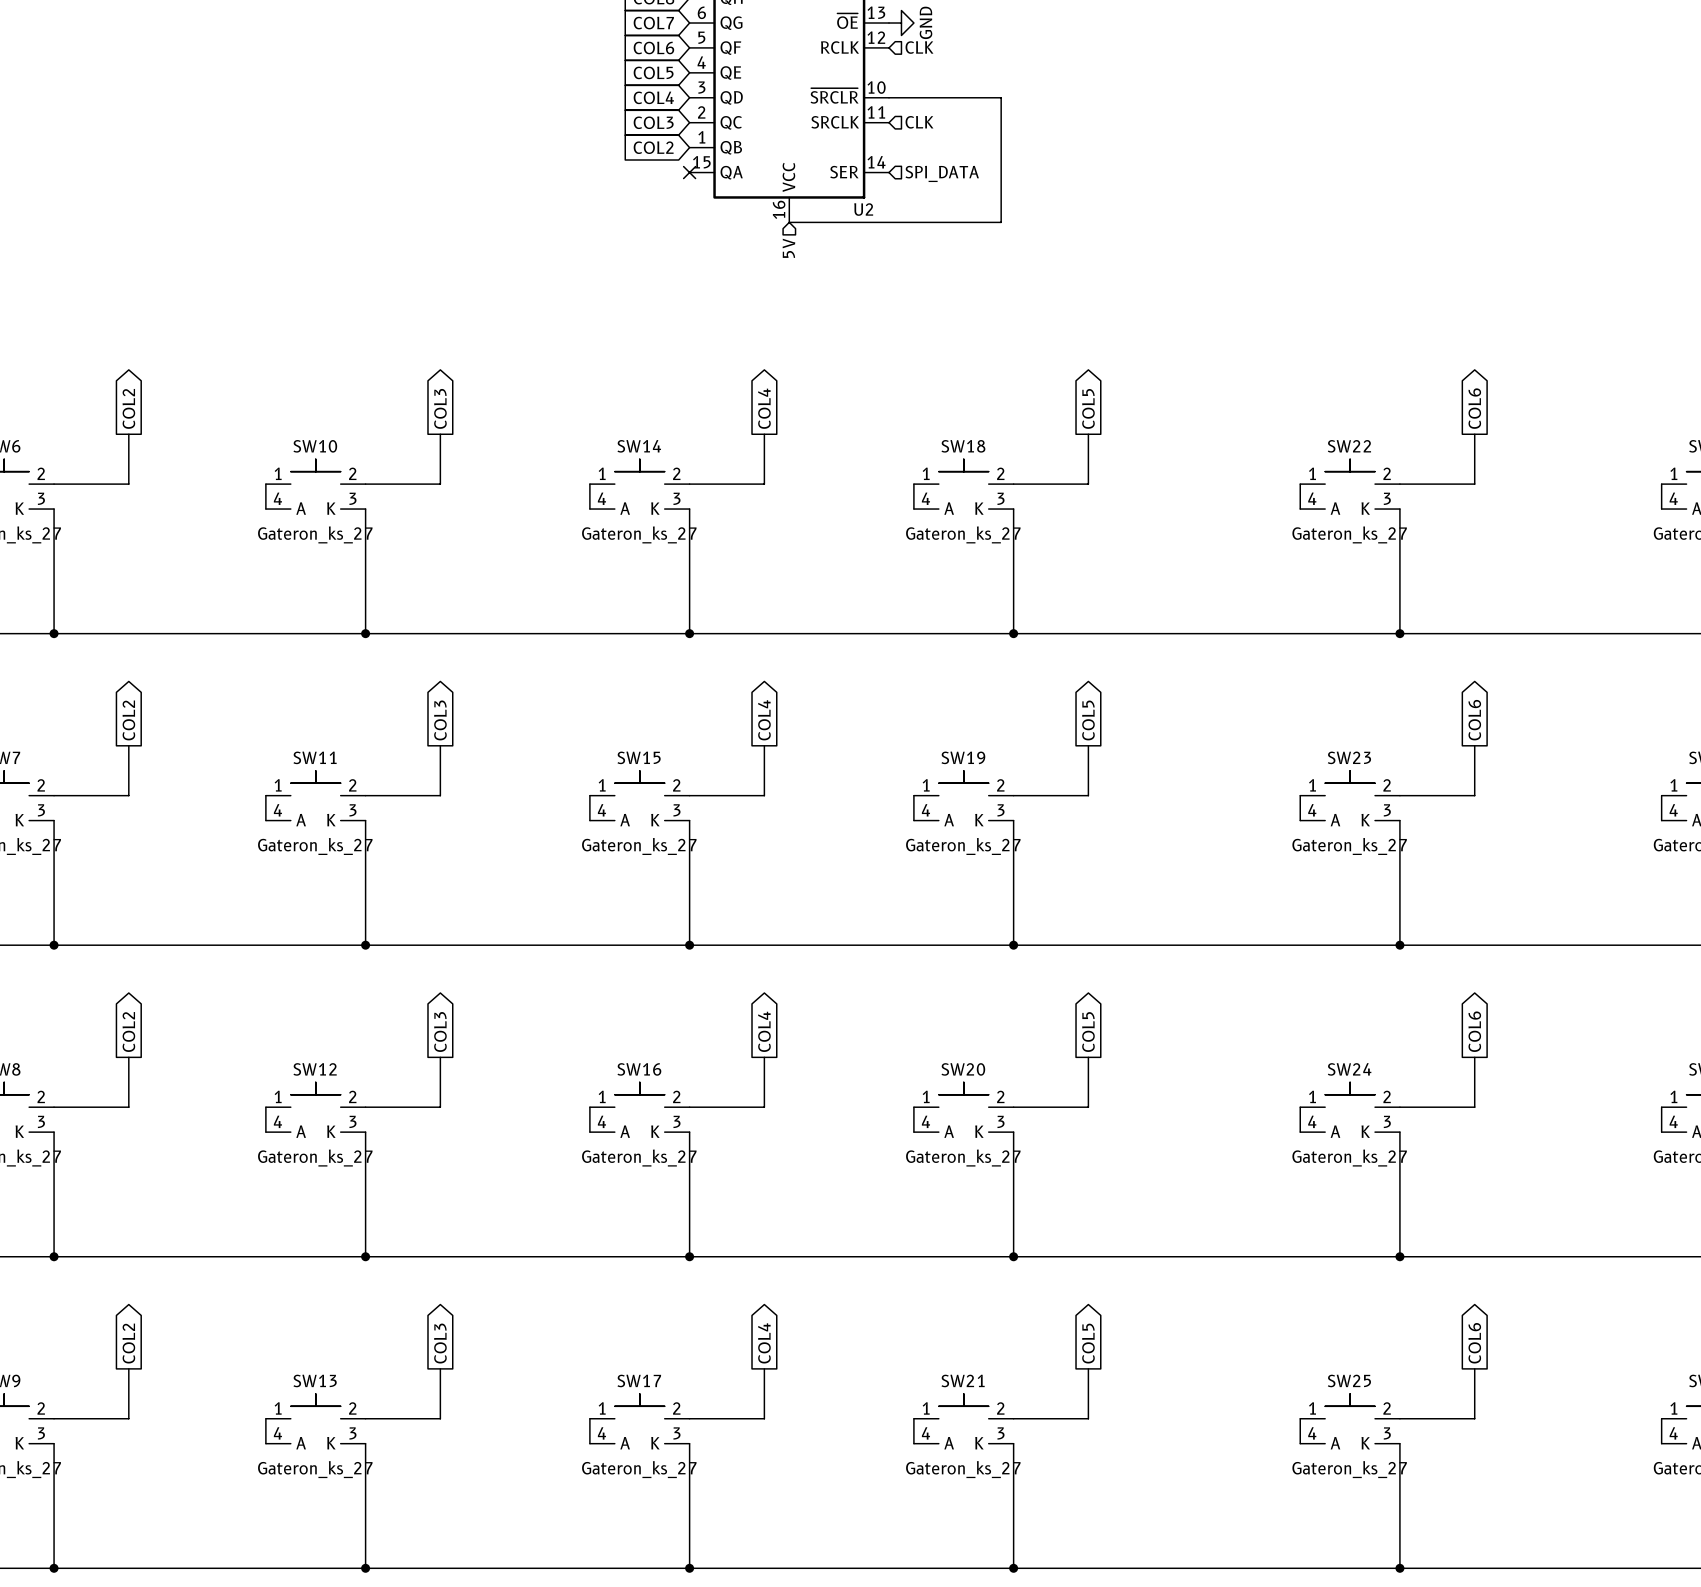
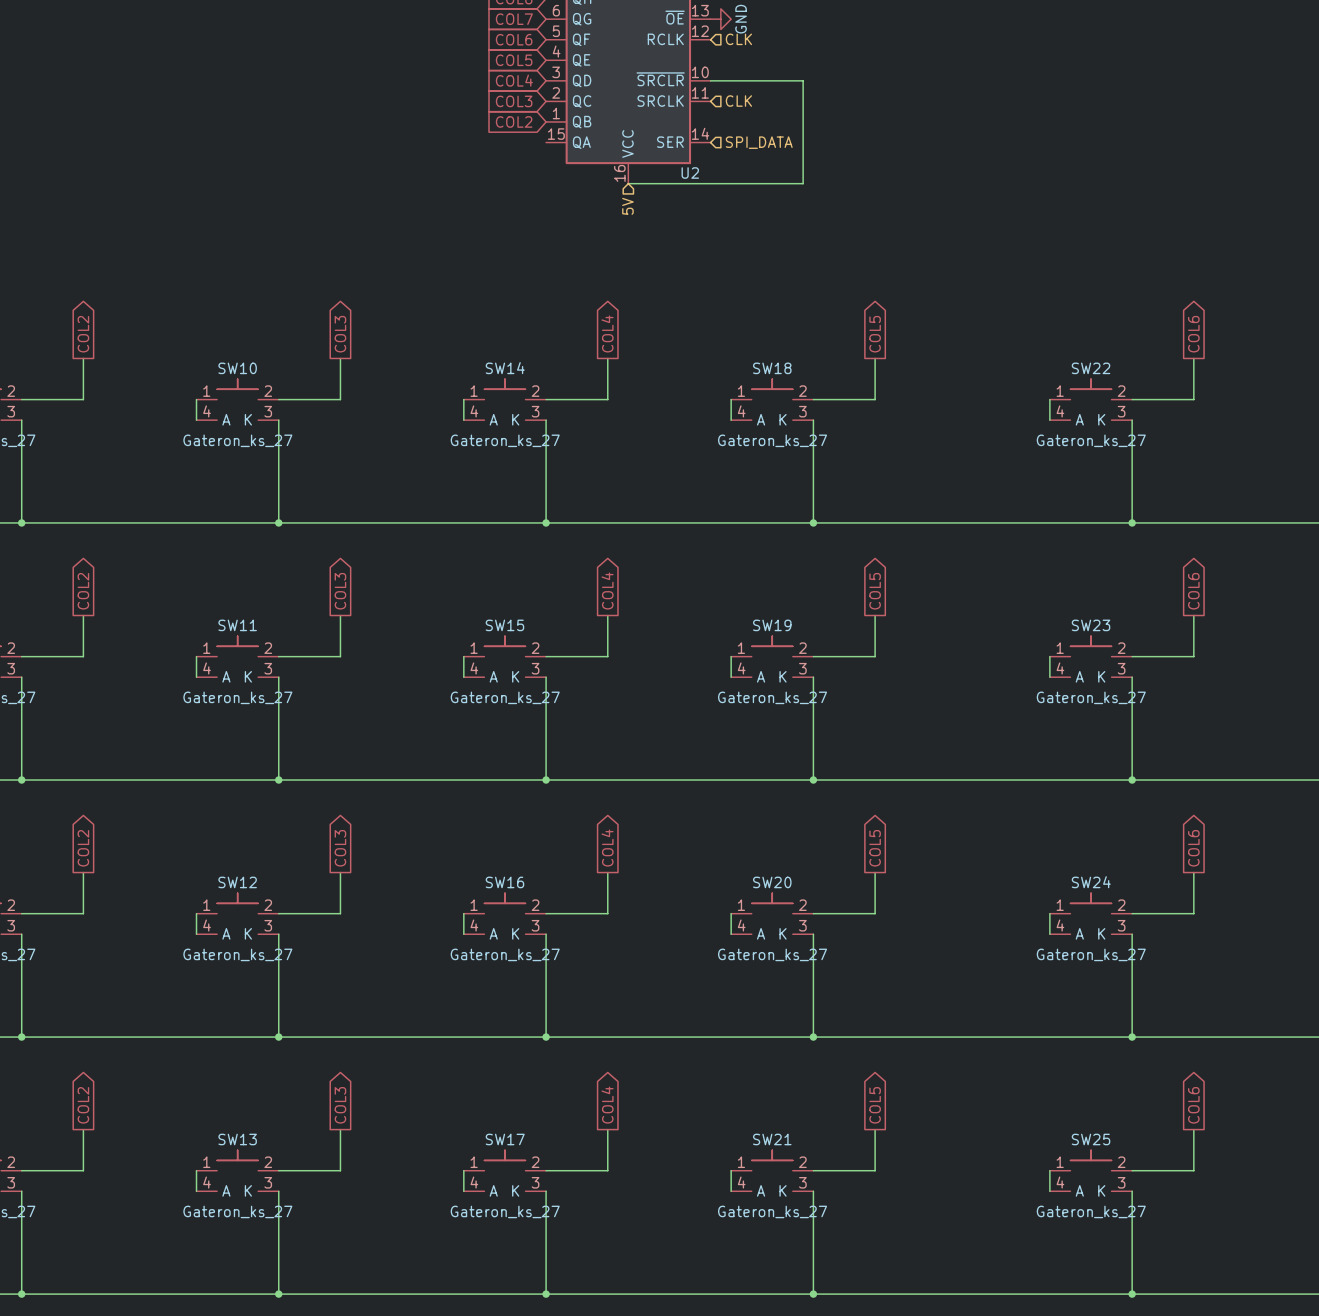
no-connect mark: (689, 172) -> none

